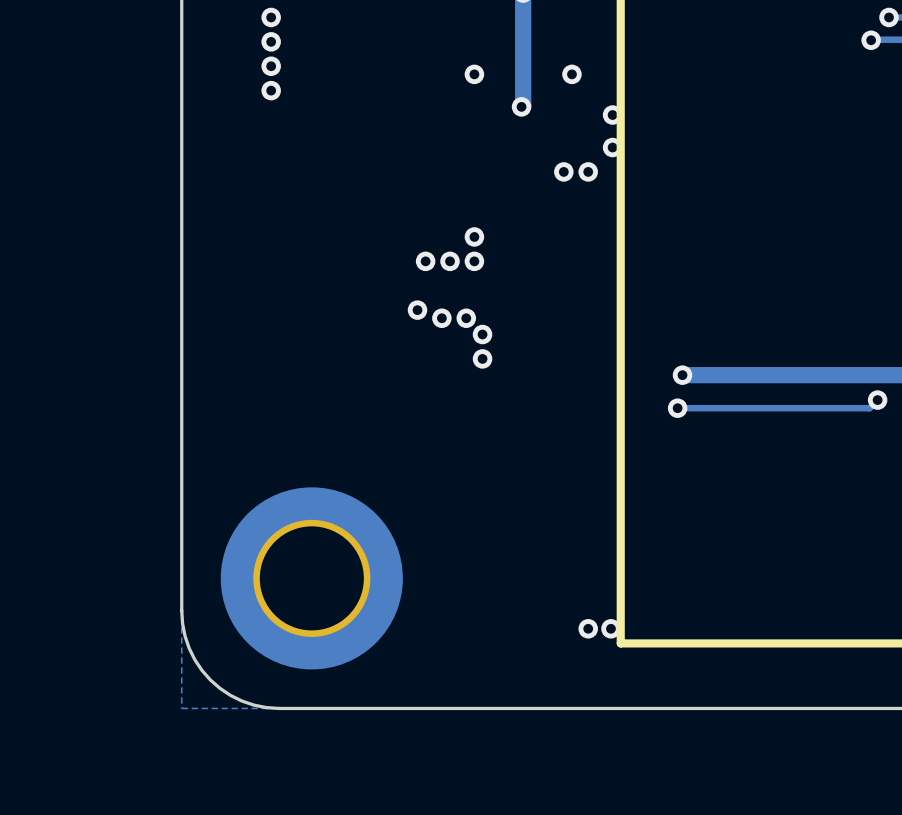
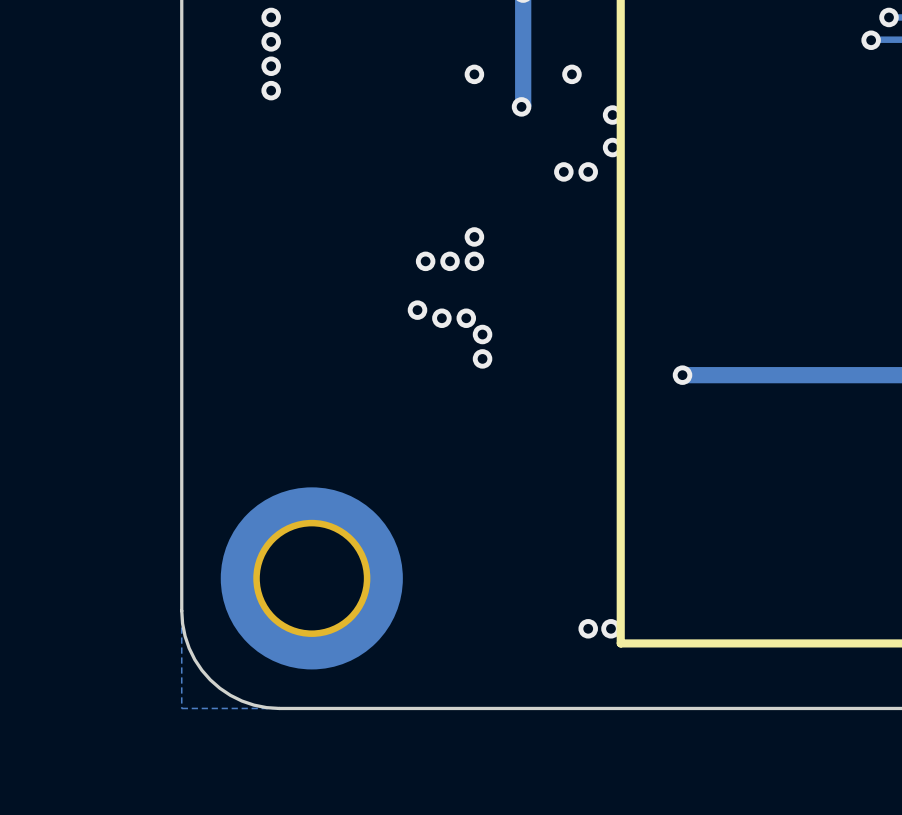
track: (877, 400) (869, 408) (677, 408) -> none
via: (877, 400) -> none
via: (677, 408) -> none

